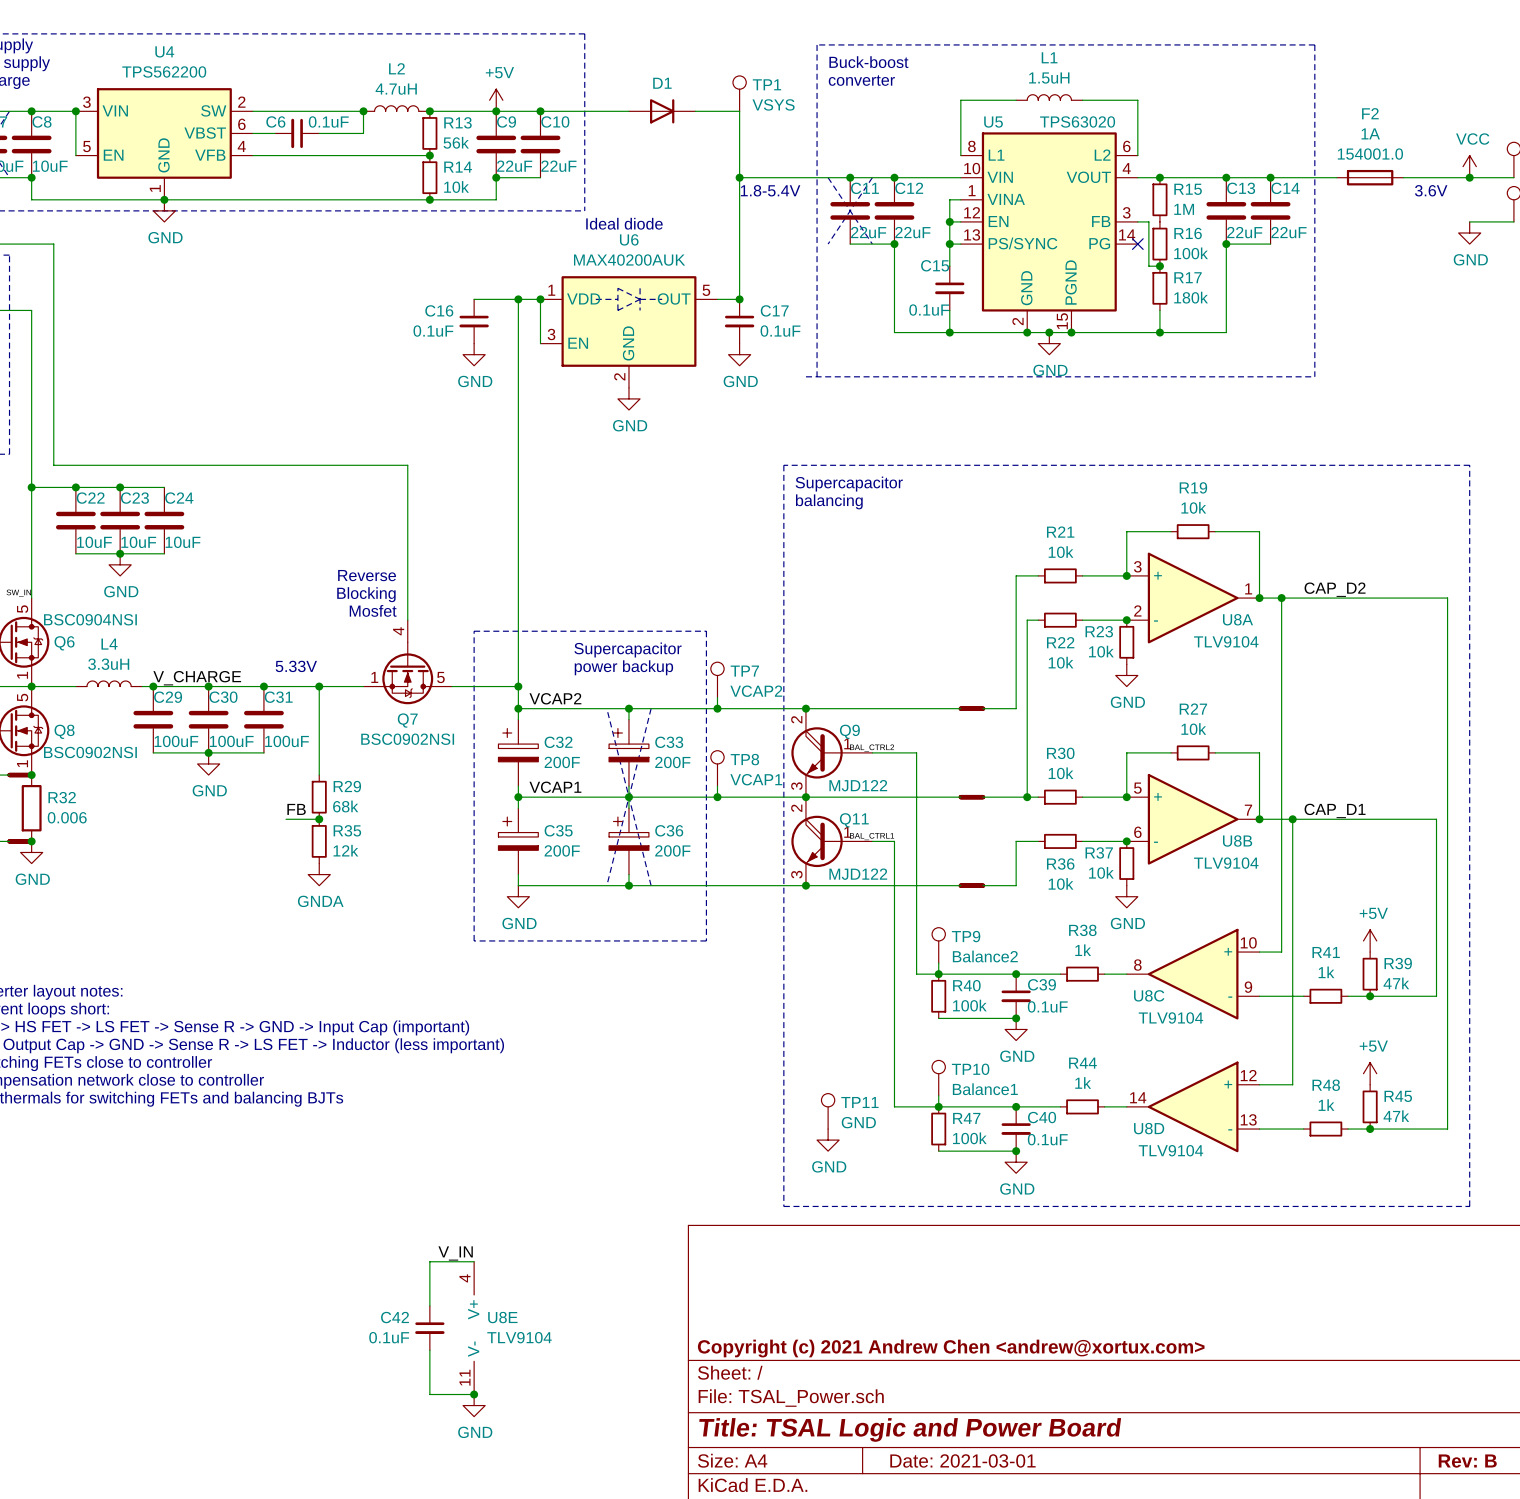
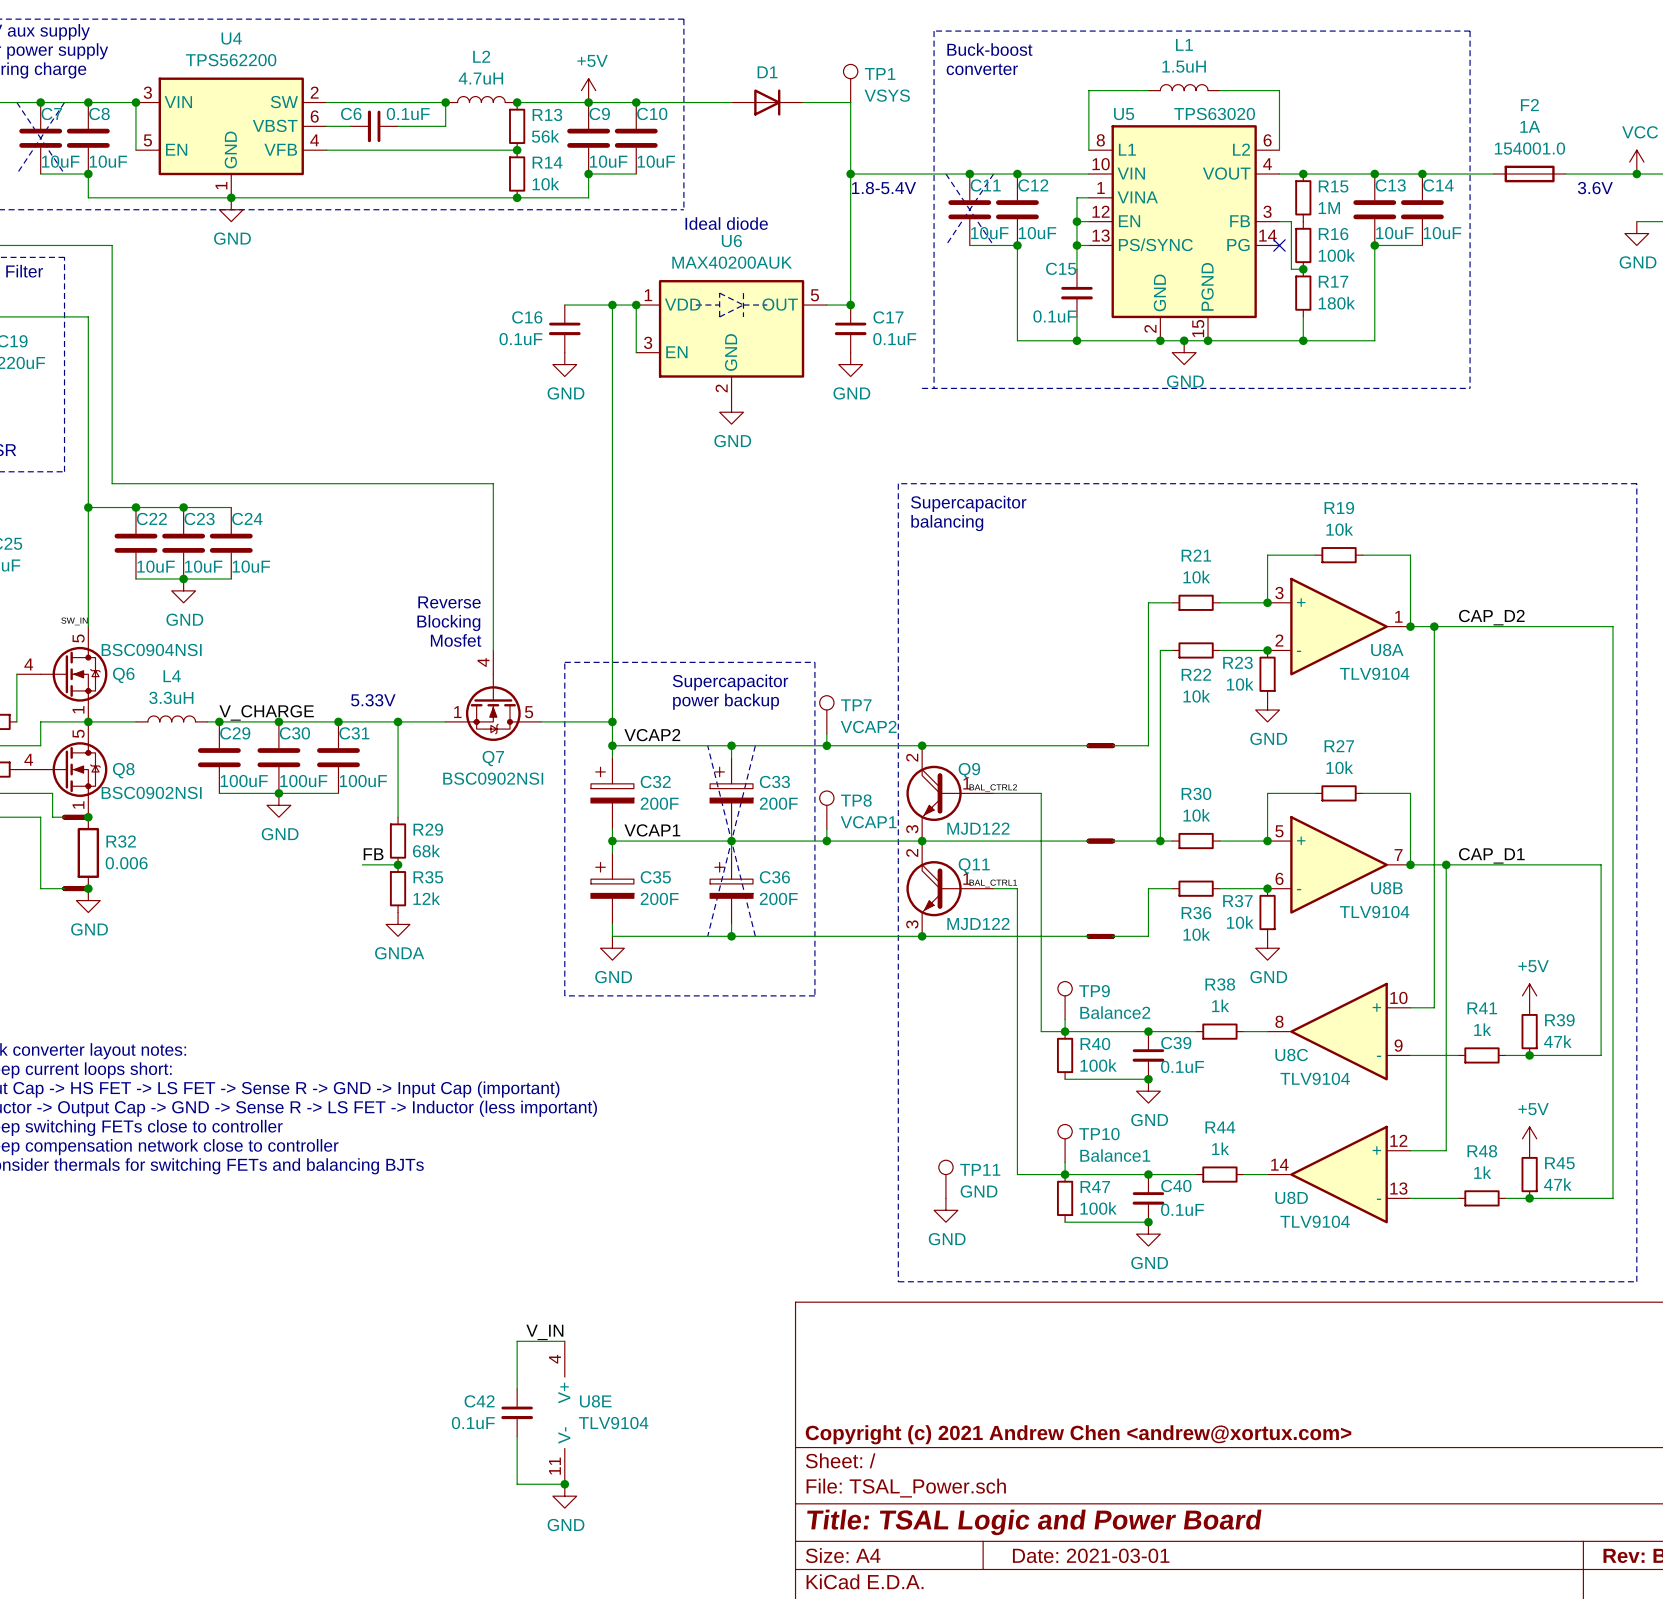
C9 value: 22uF (514, 166) -> 10uF (608, 161)
C10 value: 22uF (558, 166) -> 10uF (656, 161)
C11 value: 22uF (868, 232) -> 10uF (989, 233)
C12 value: 22uF (912, 232) -> 10uF (1037, 233)
C13 value: 22uF (1244, 232) -> 10uF (1394, 233)
C14 value: 22uF (1288, 232) -> 10uF (1442, 233)

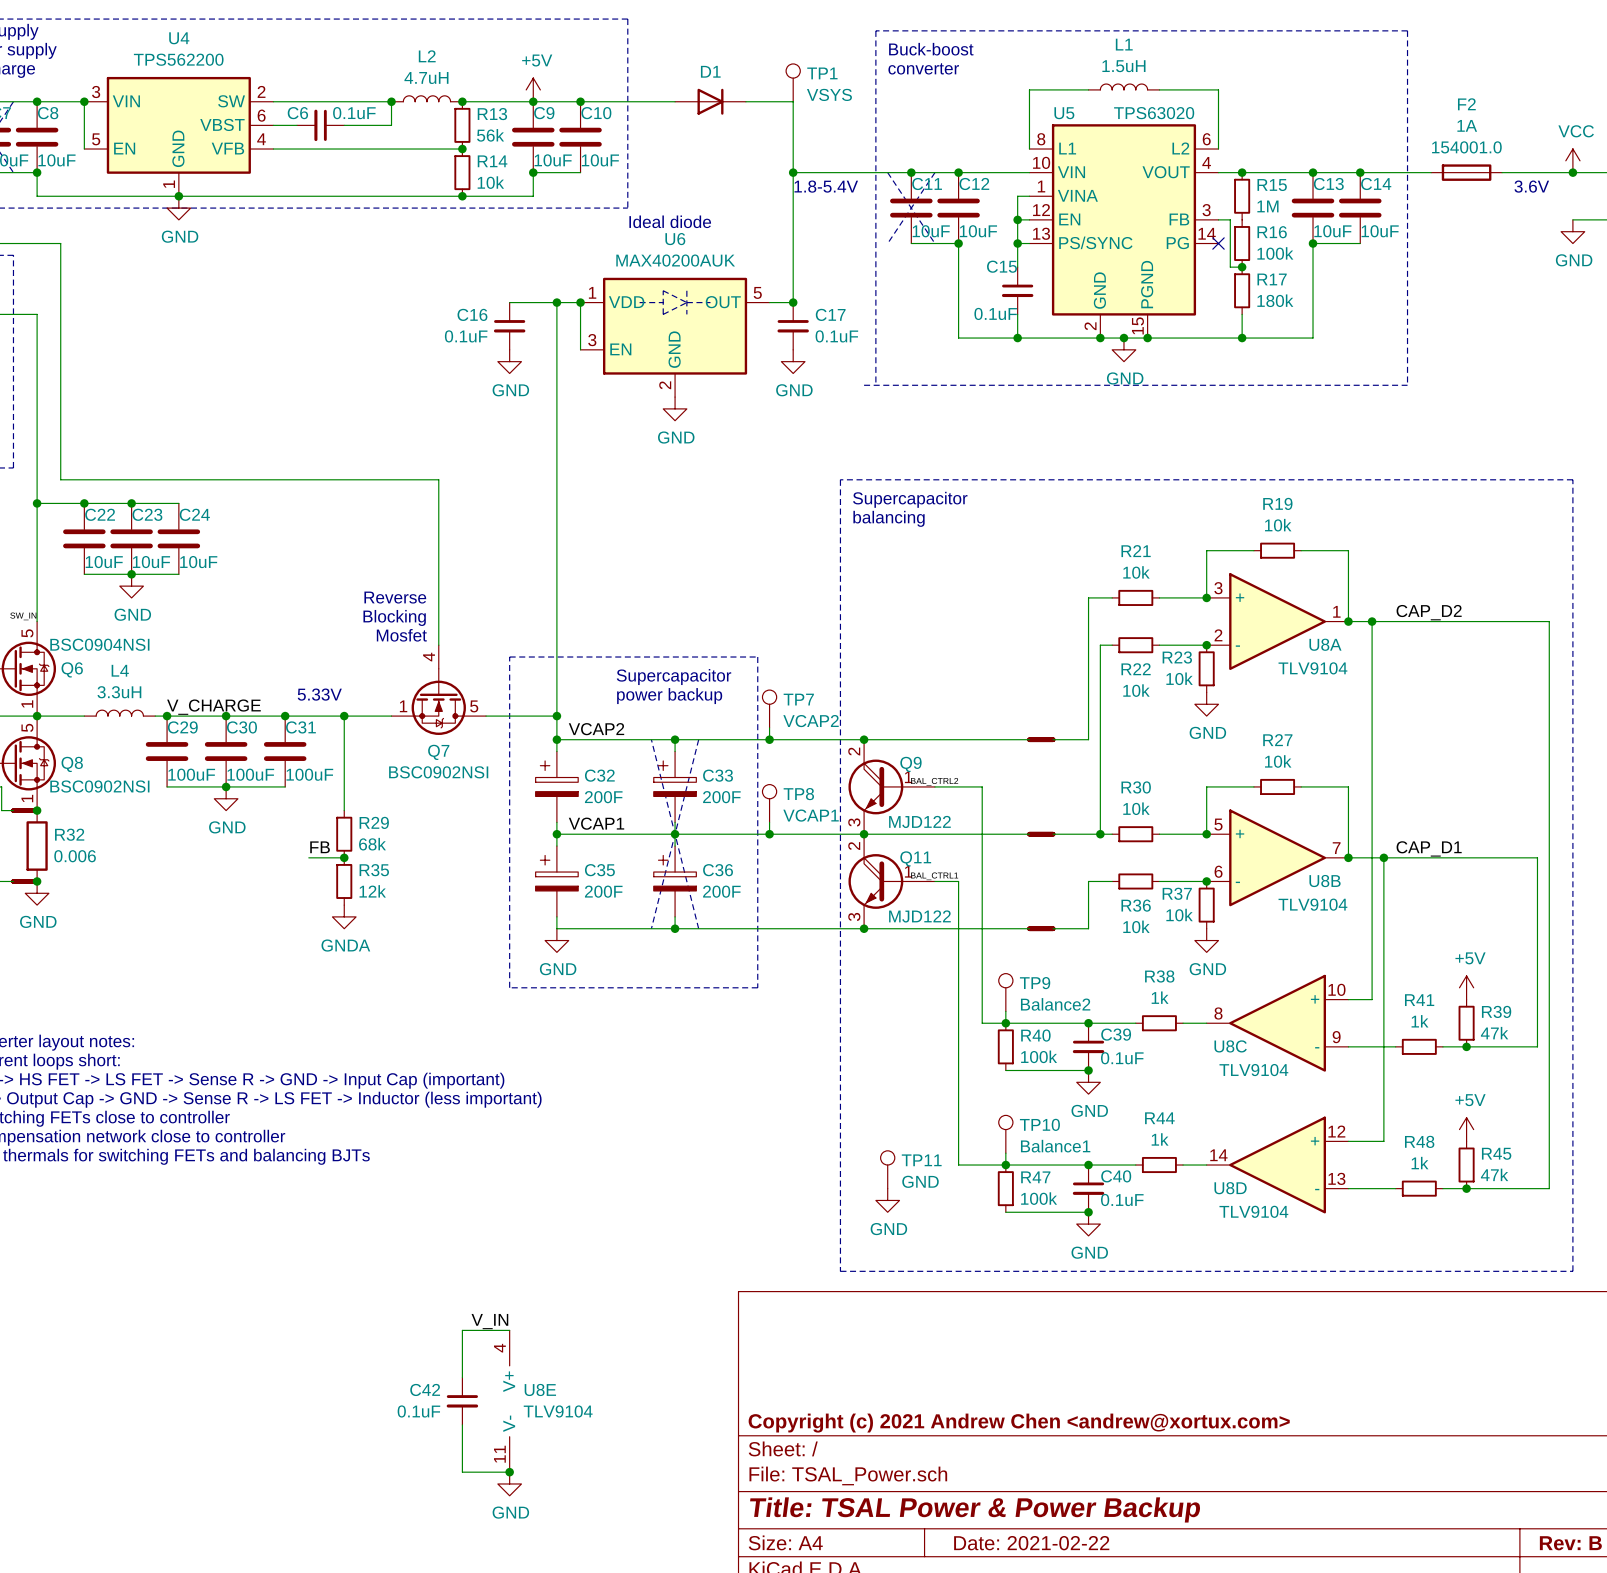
title block: Title: TSAL Logic and Power Board (1034, 1522) -> Title: TSAL Power & Power Backup (975, 1509)
title block: Date: 2021-03-01 (1091, 1555) -> Date: 2021-02-22 (1031, 1543)

